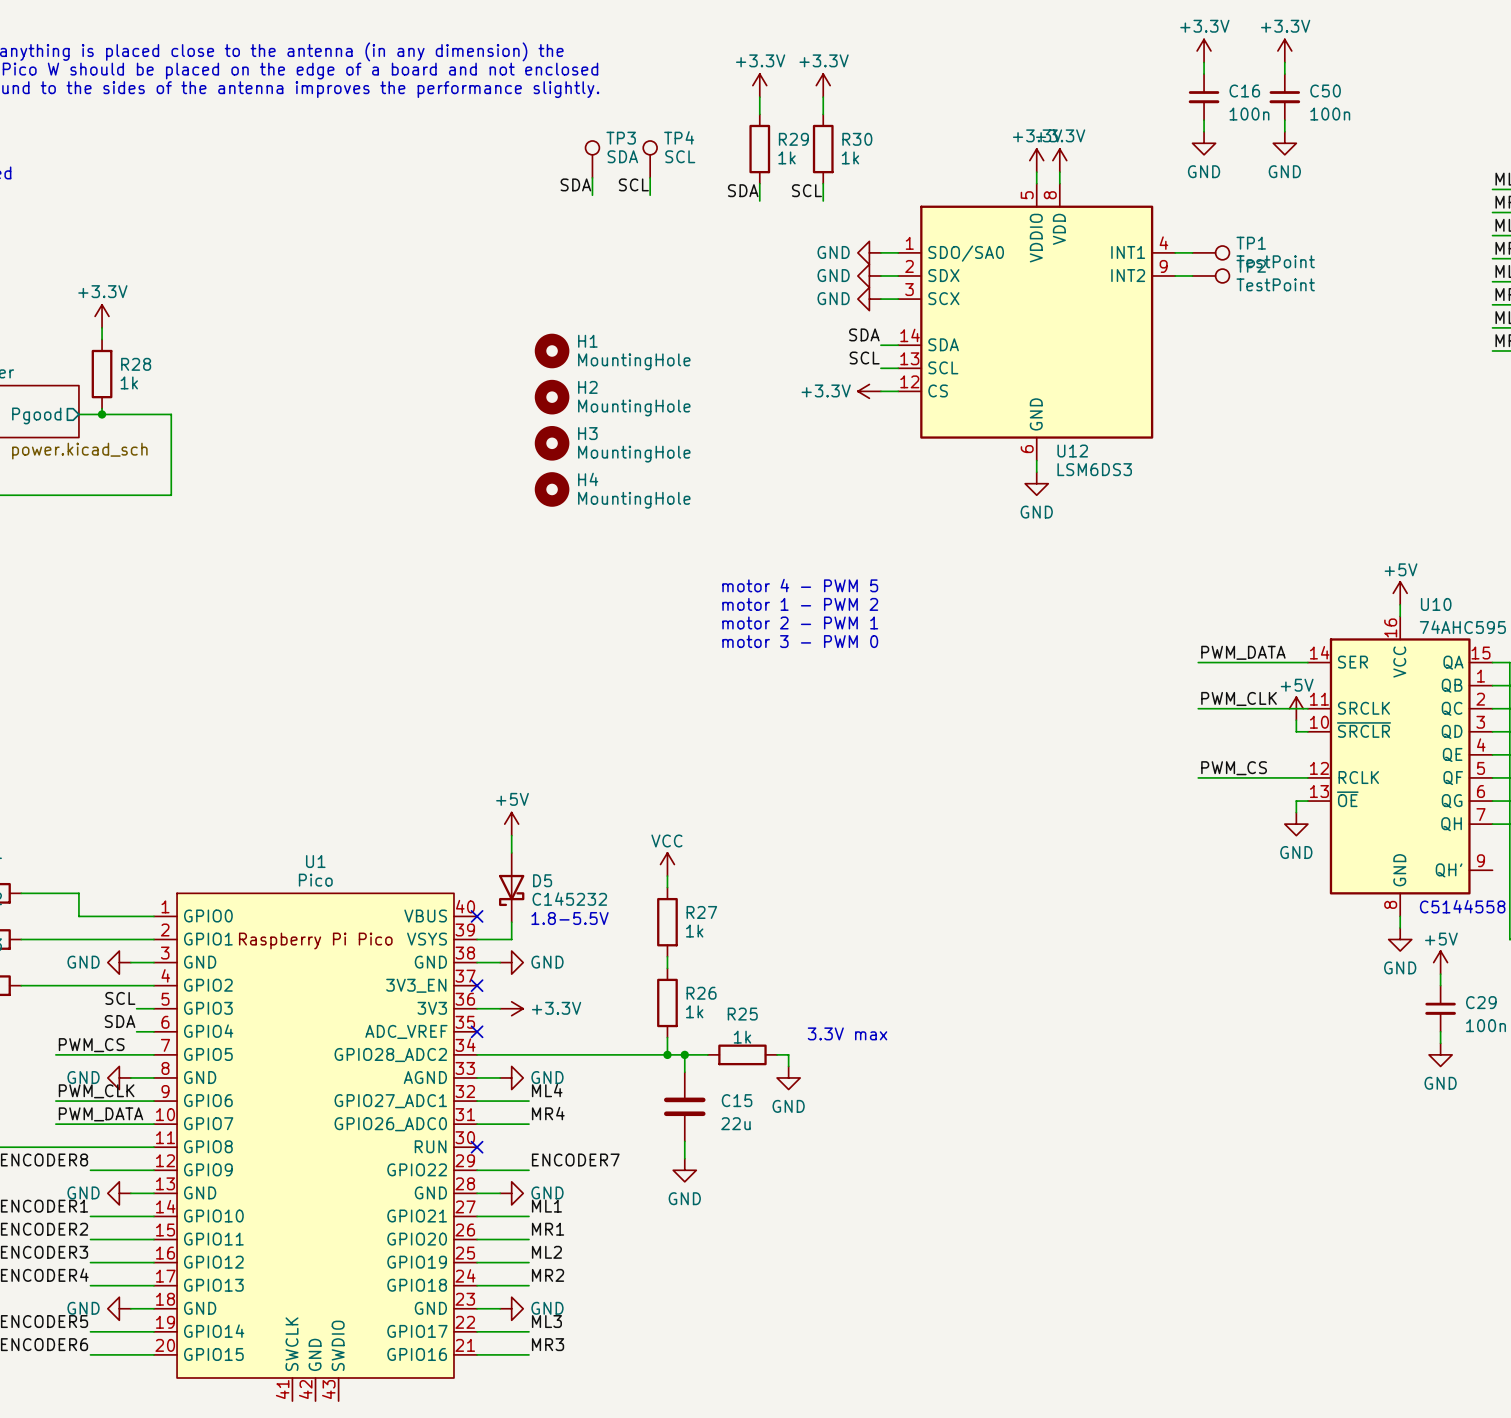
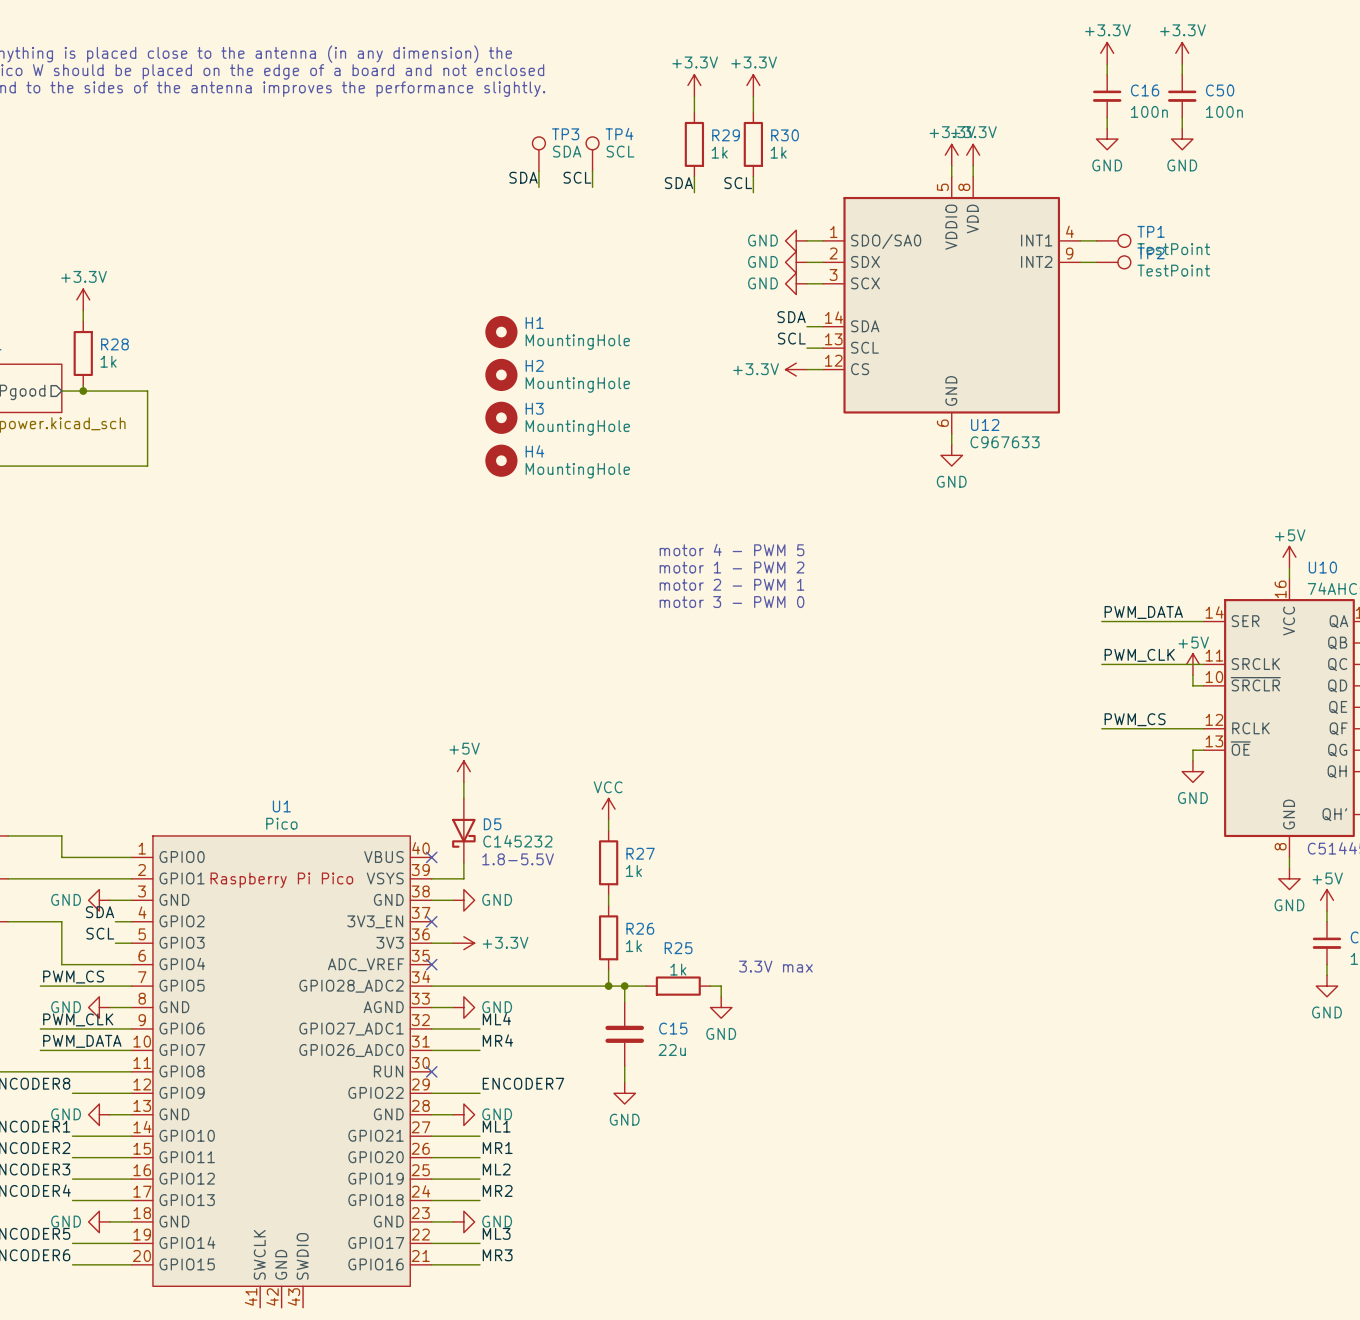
U12 value: LSM6DS3 (1094, 469) -> C967633 (1005, 442)
wire: (78, 985) (136, 985) -> (61, 921) (61, 964) (115, 964)
label position: SDA (120, 1021) -> SDA (100, 912)

